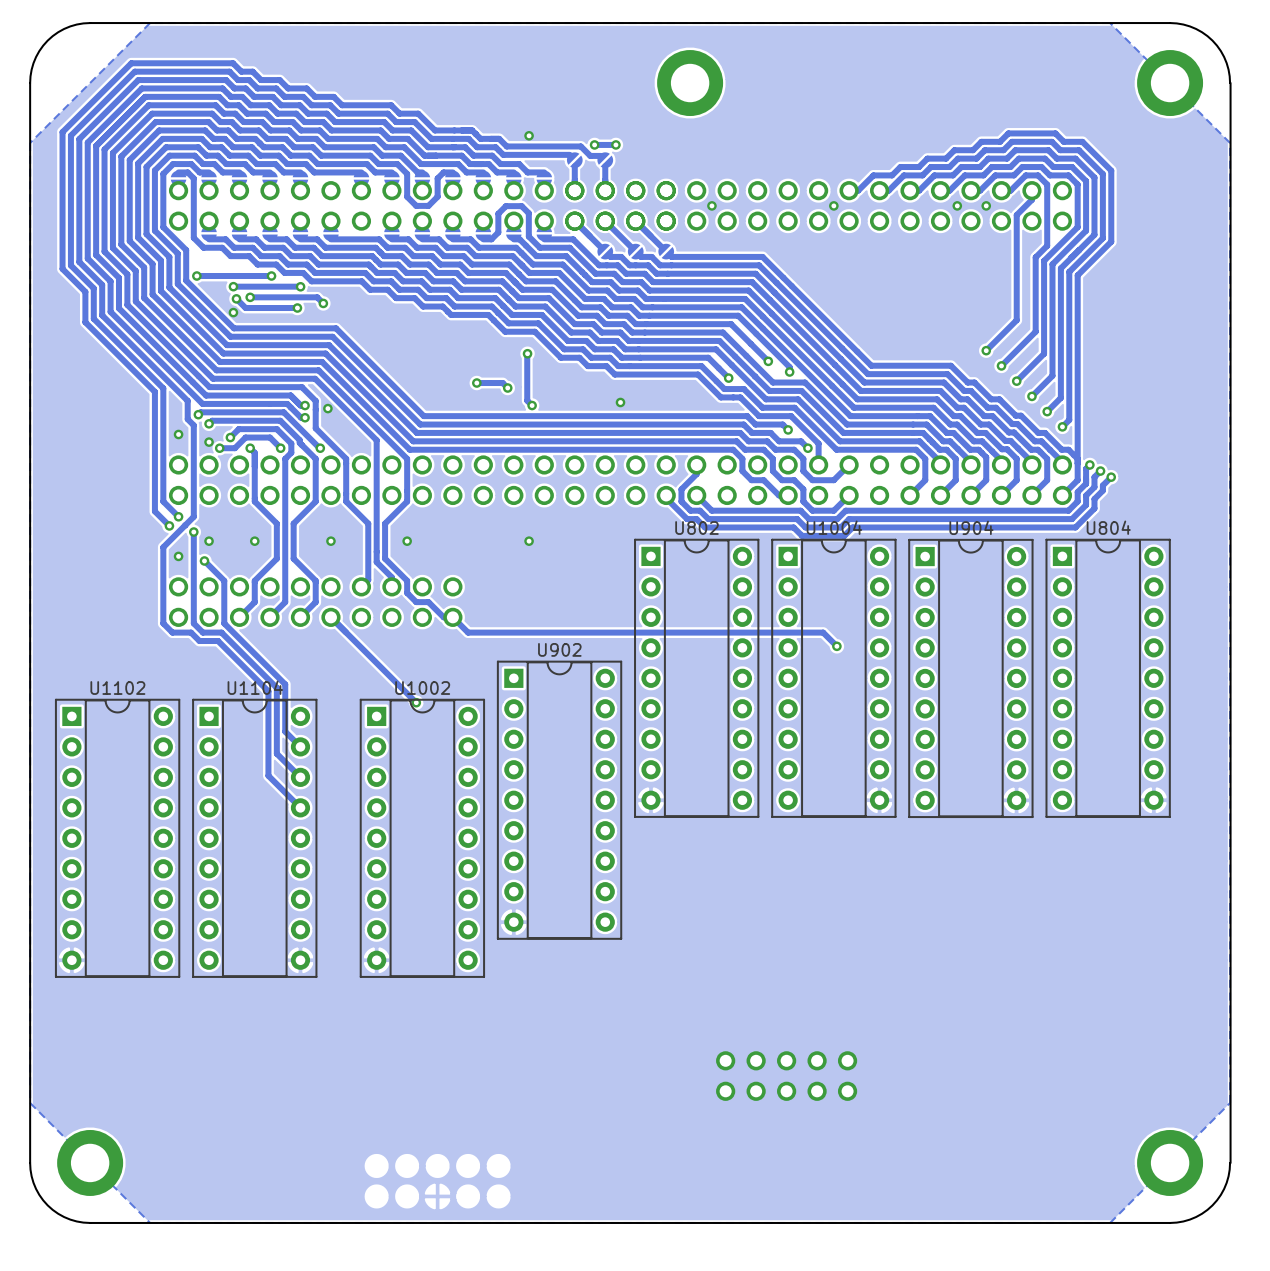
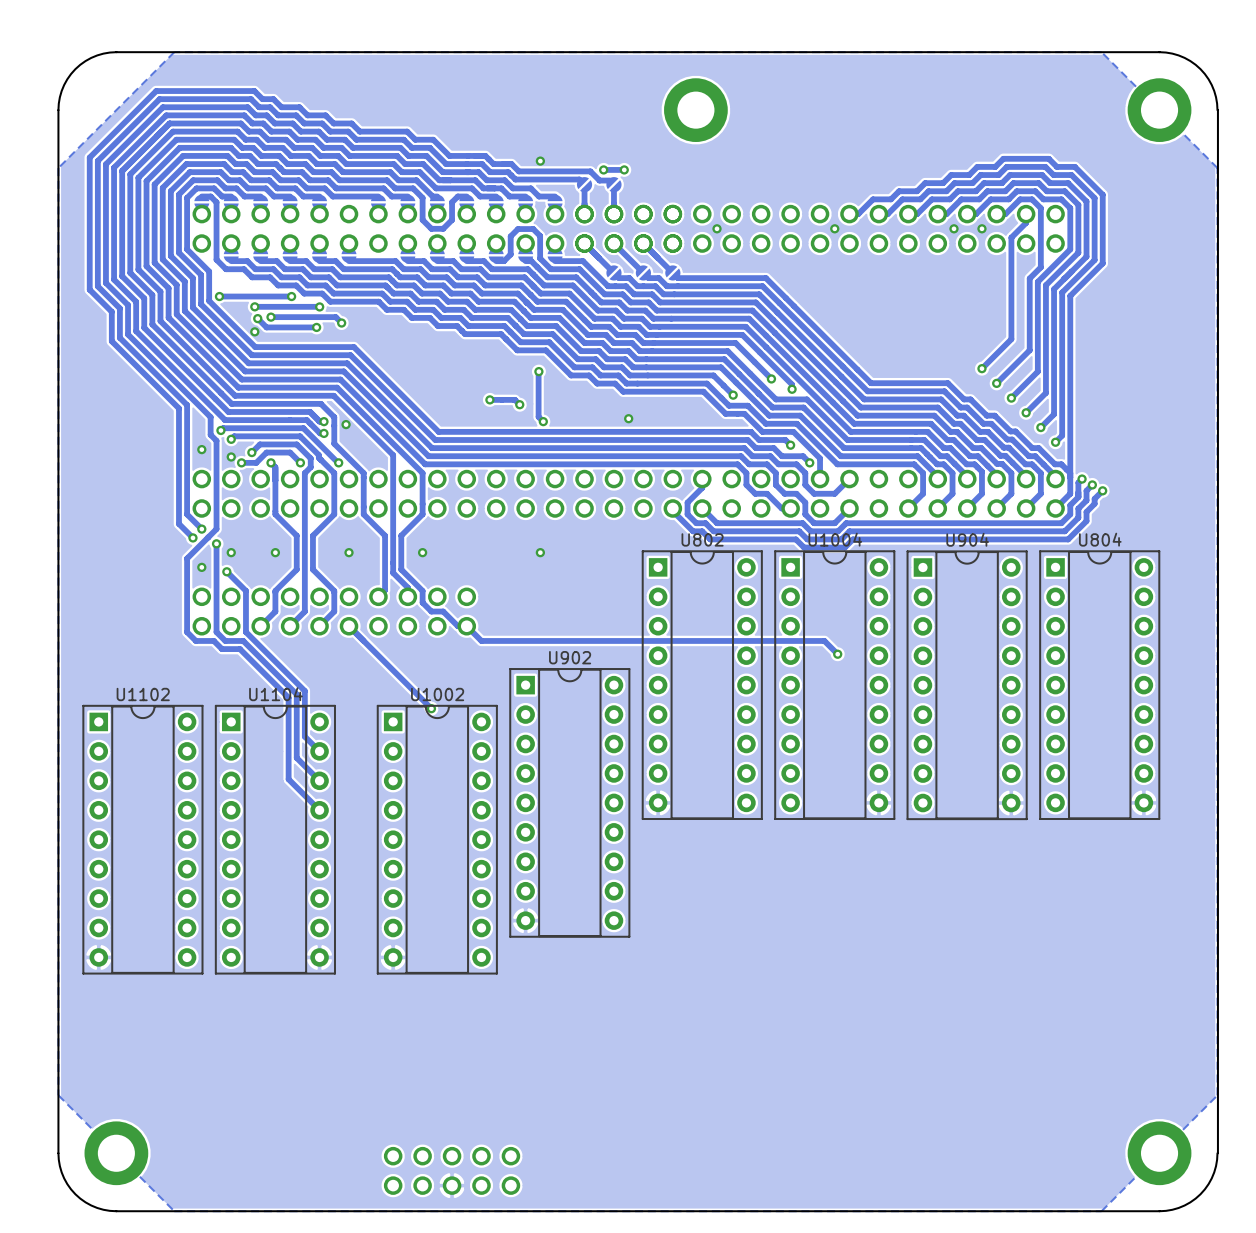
part: (786, 1076) -> none
part: none -> (452, 1170)

